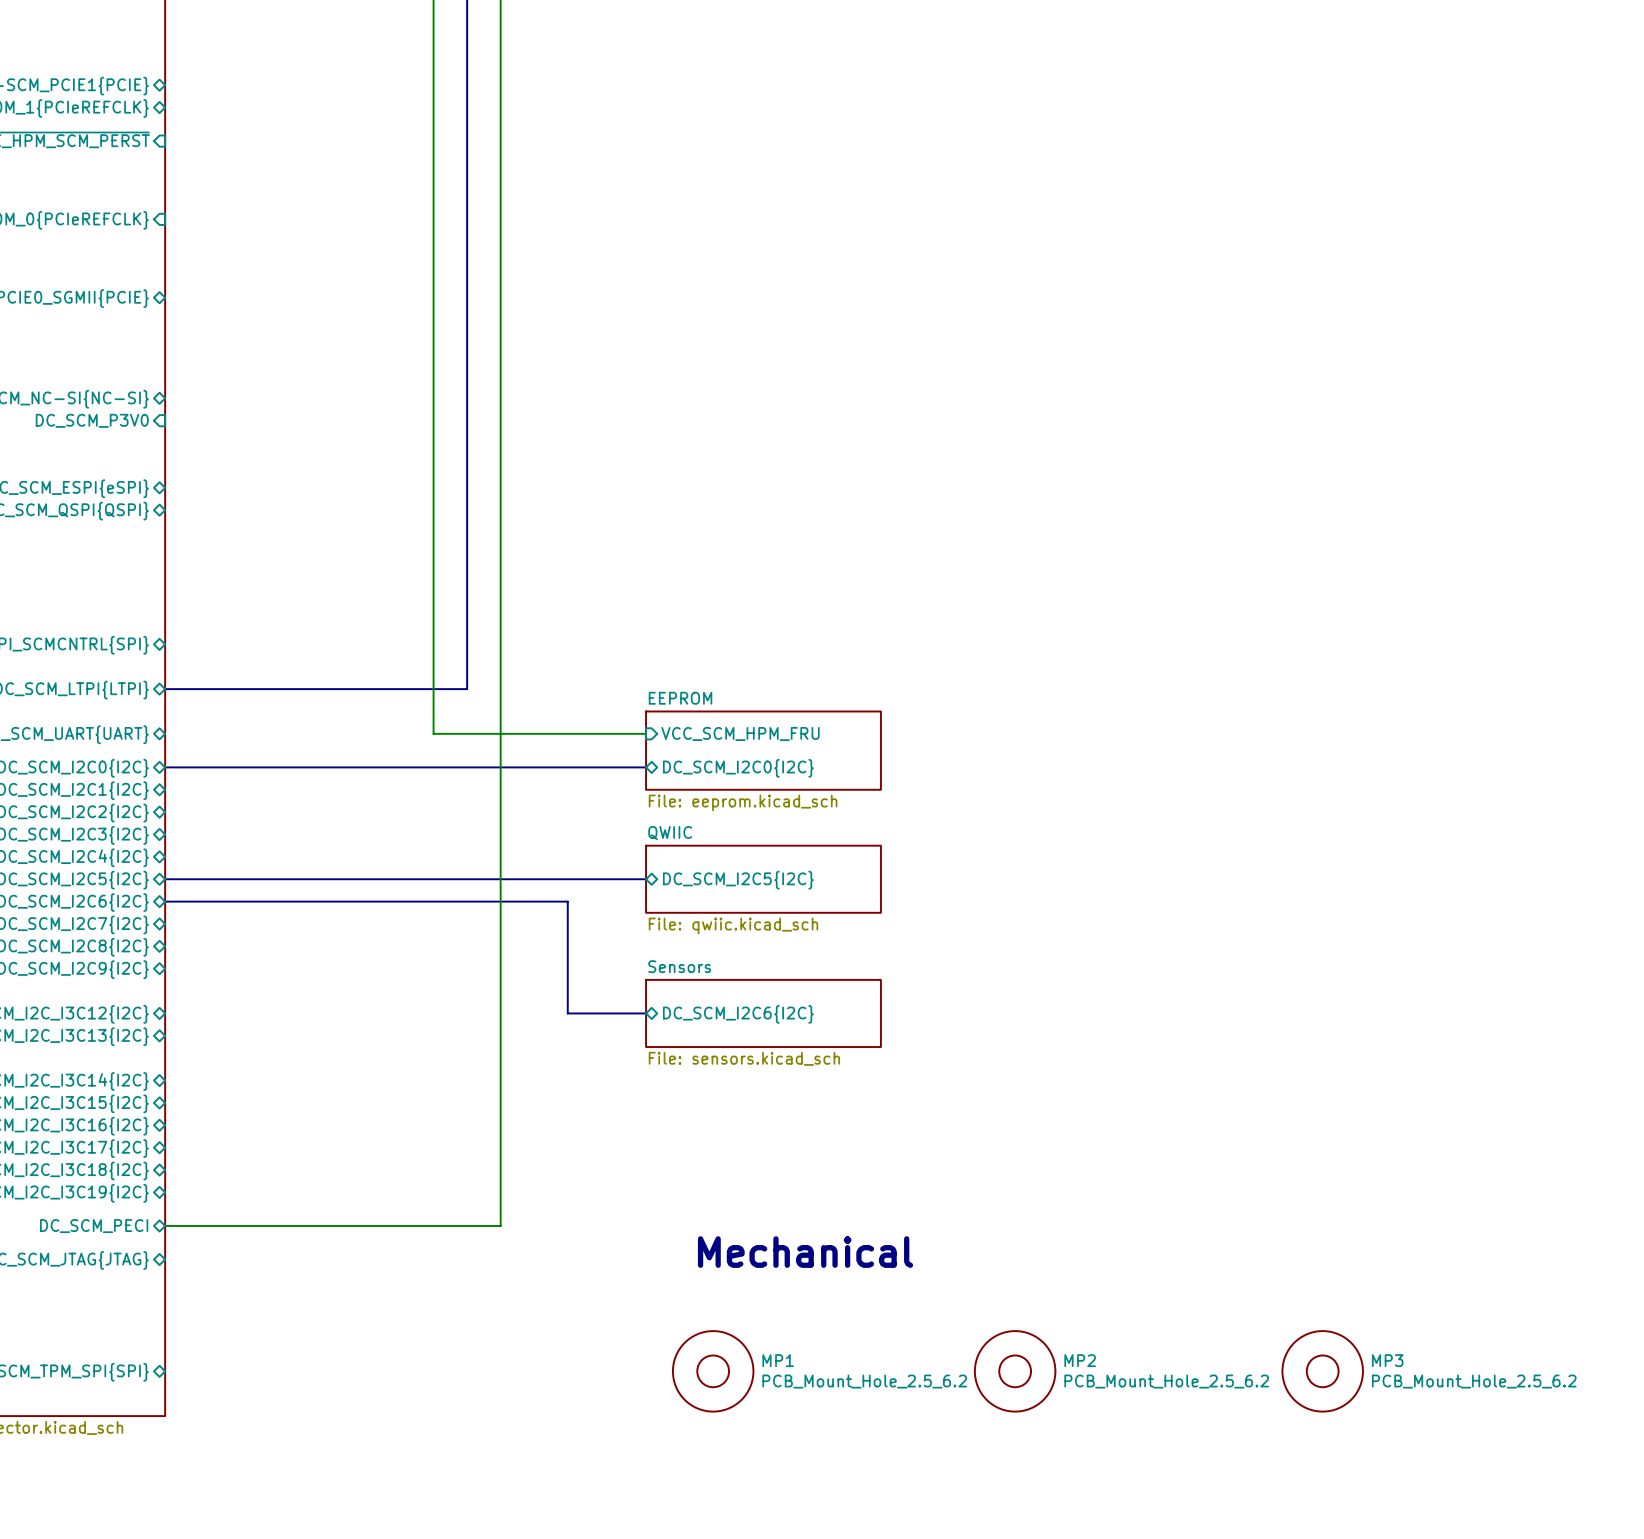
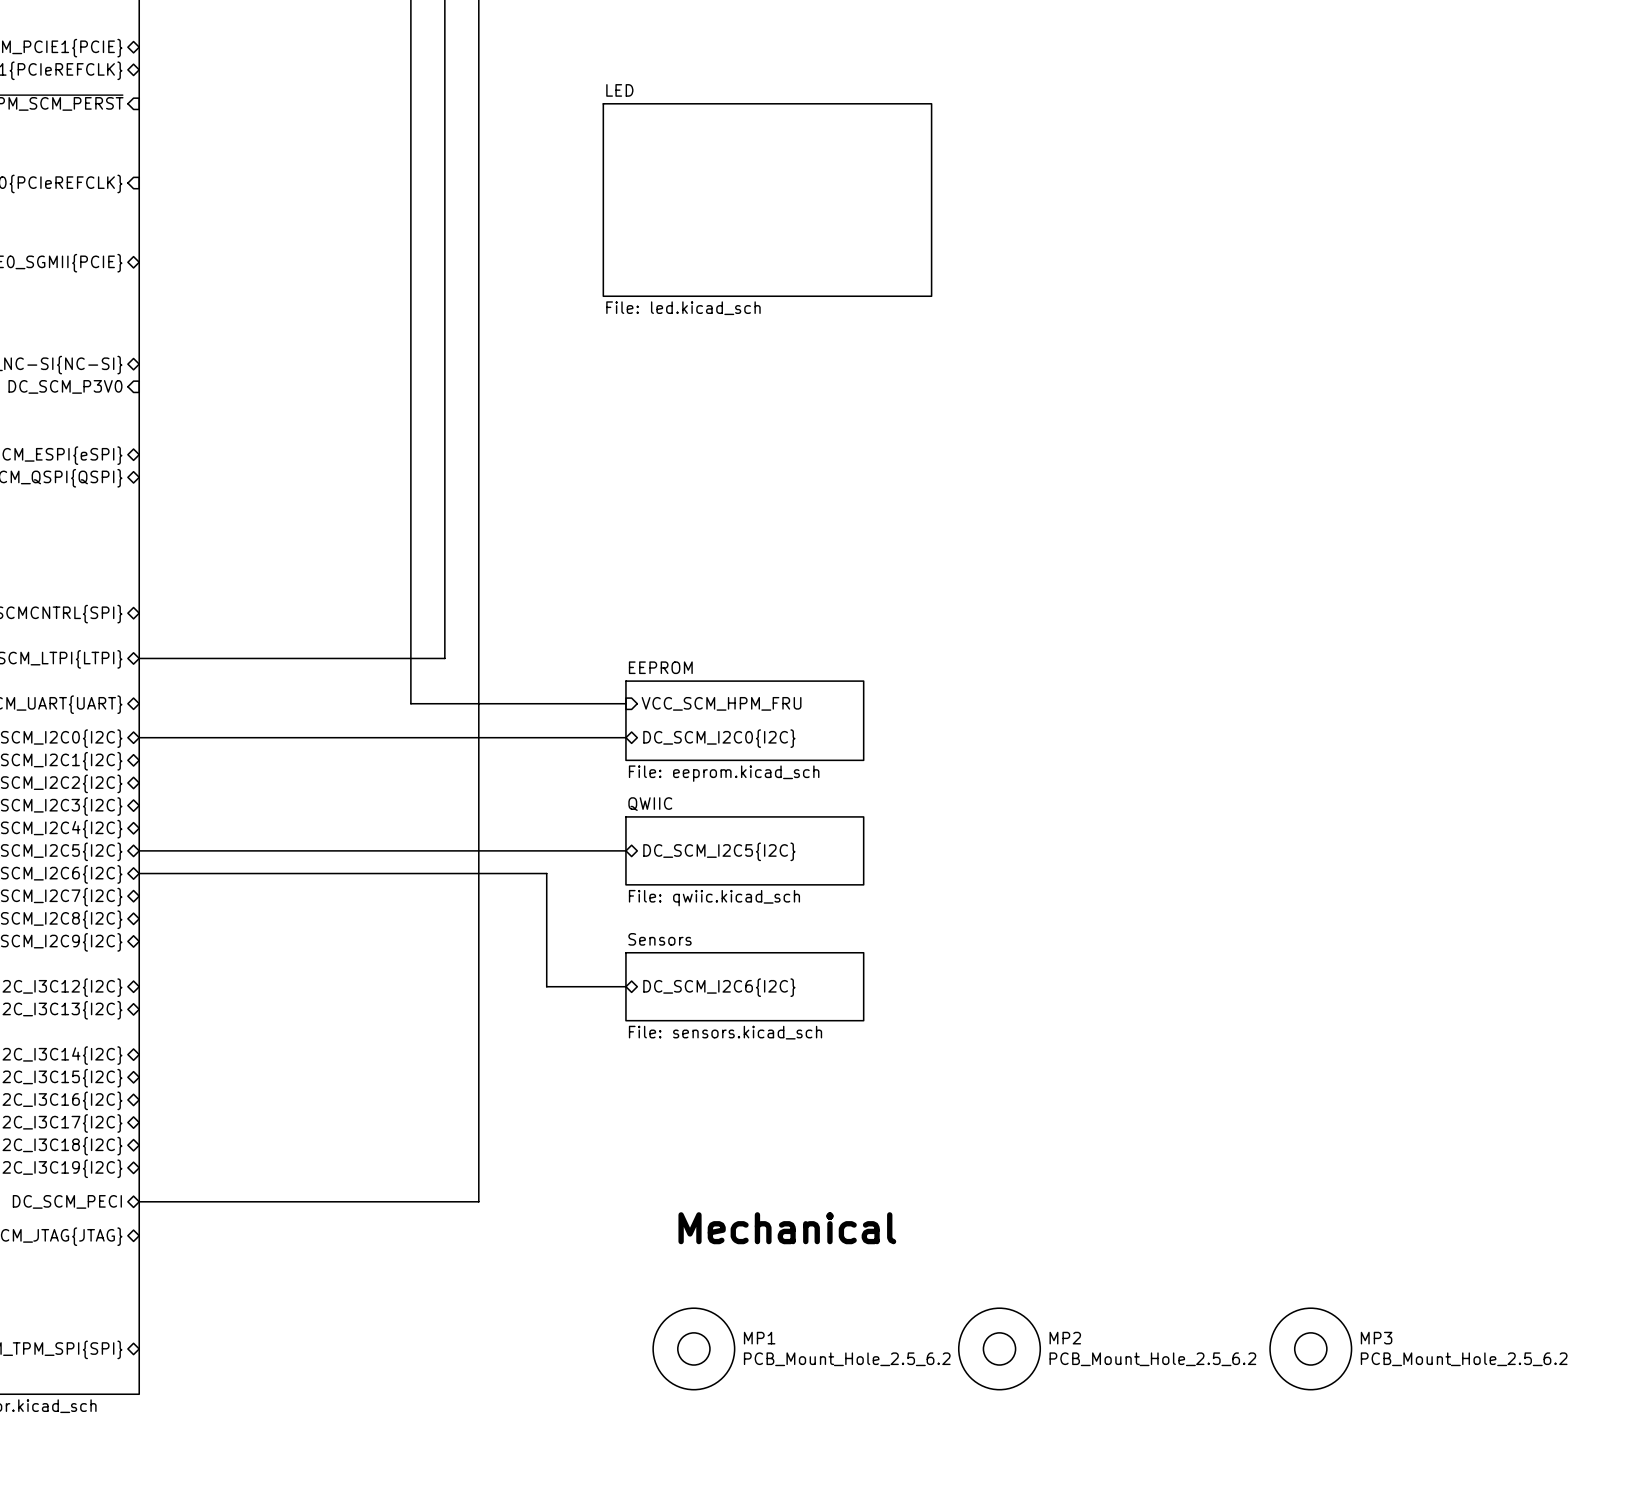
sheet LED: none -> File: led.kicad_sch (767, 200)

